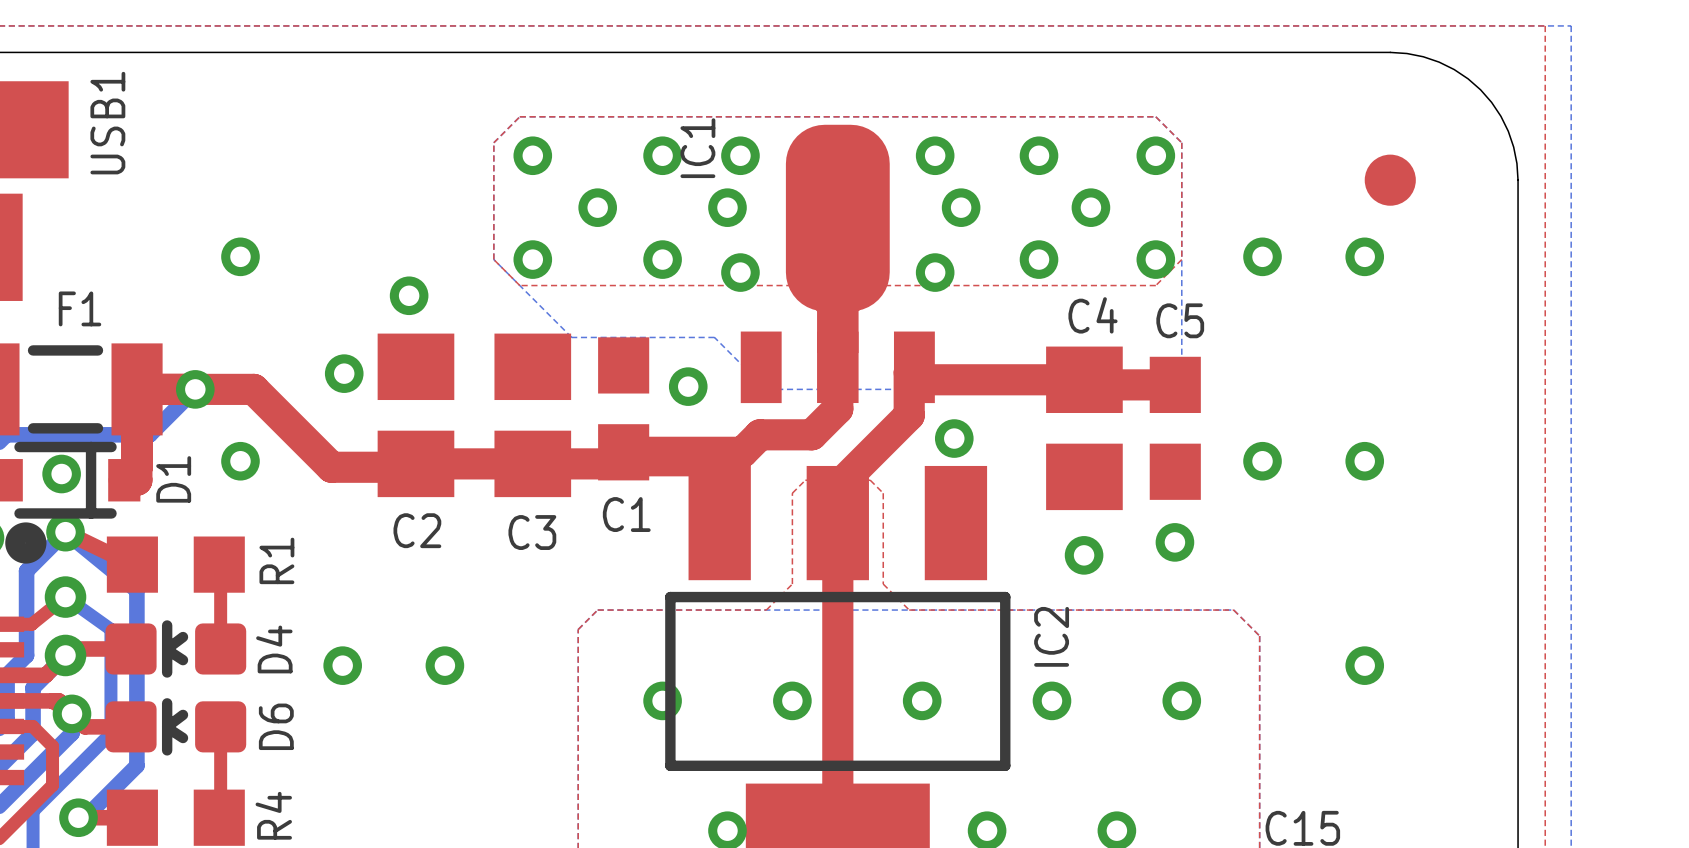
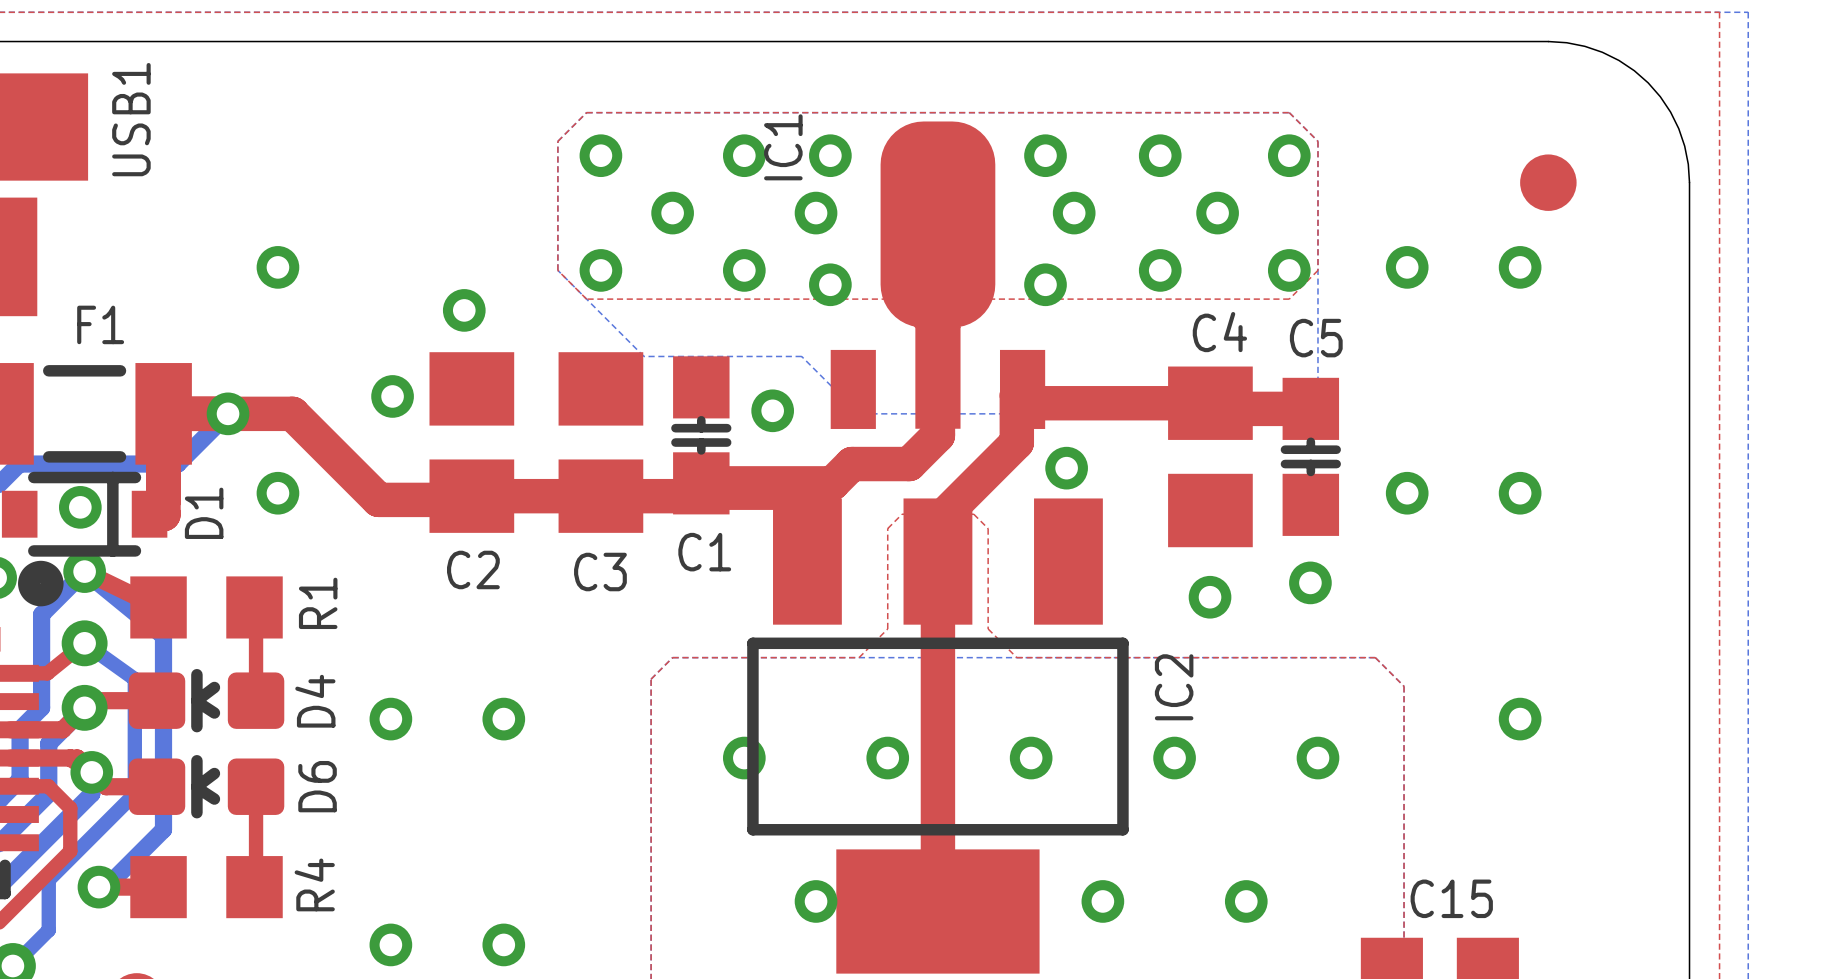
IC1 footprint: [740, 124, 935, 404] -> [830, 121, 1046, 429]
C1 footprint: [598, 337, 650, 481] -> [671, 356, 732, 515]
C5 footprint: [1149, 356, 1201, 500] -> [1280, 377, 1341, 536]

